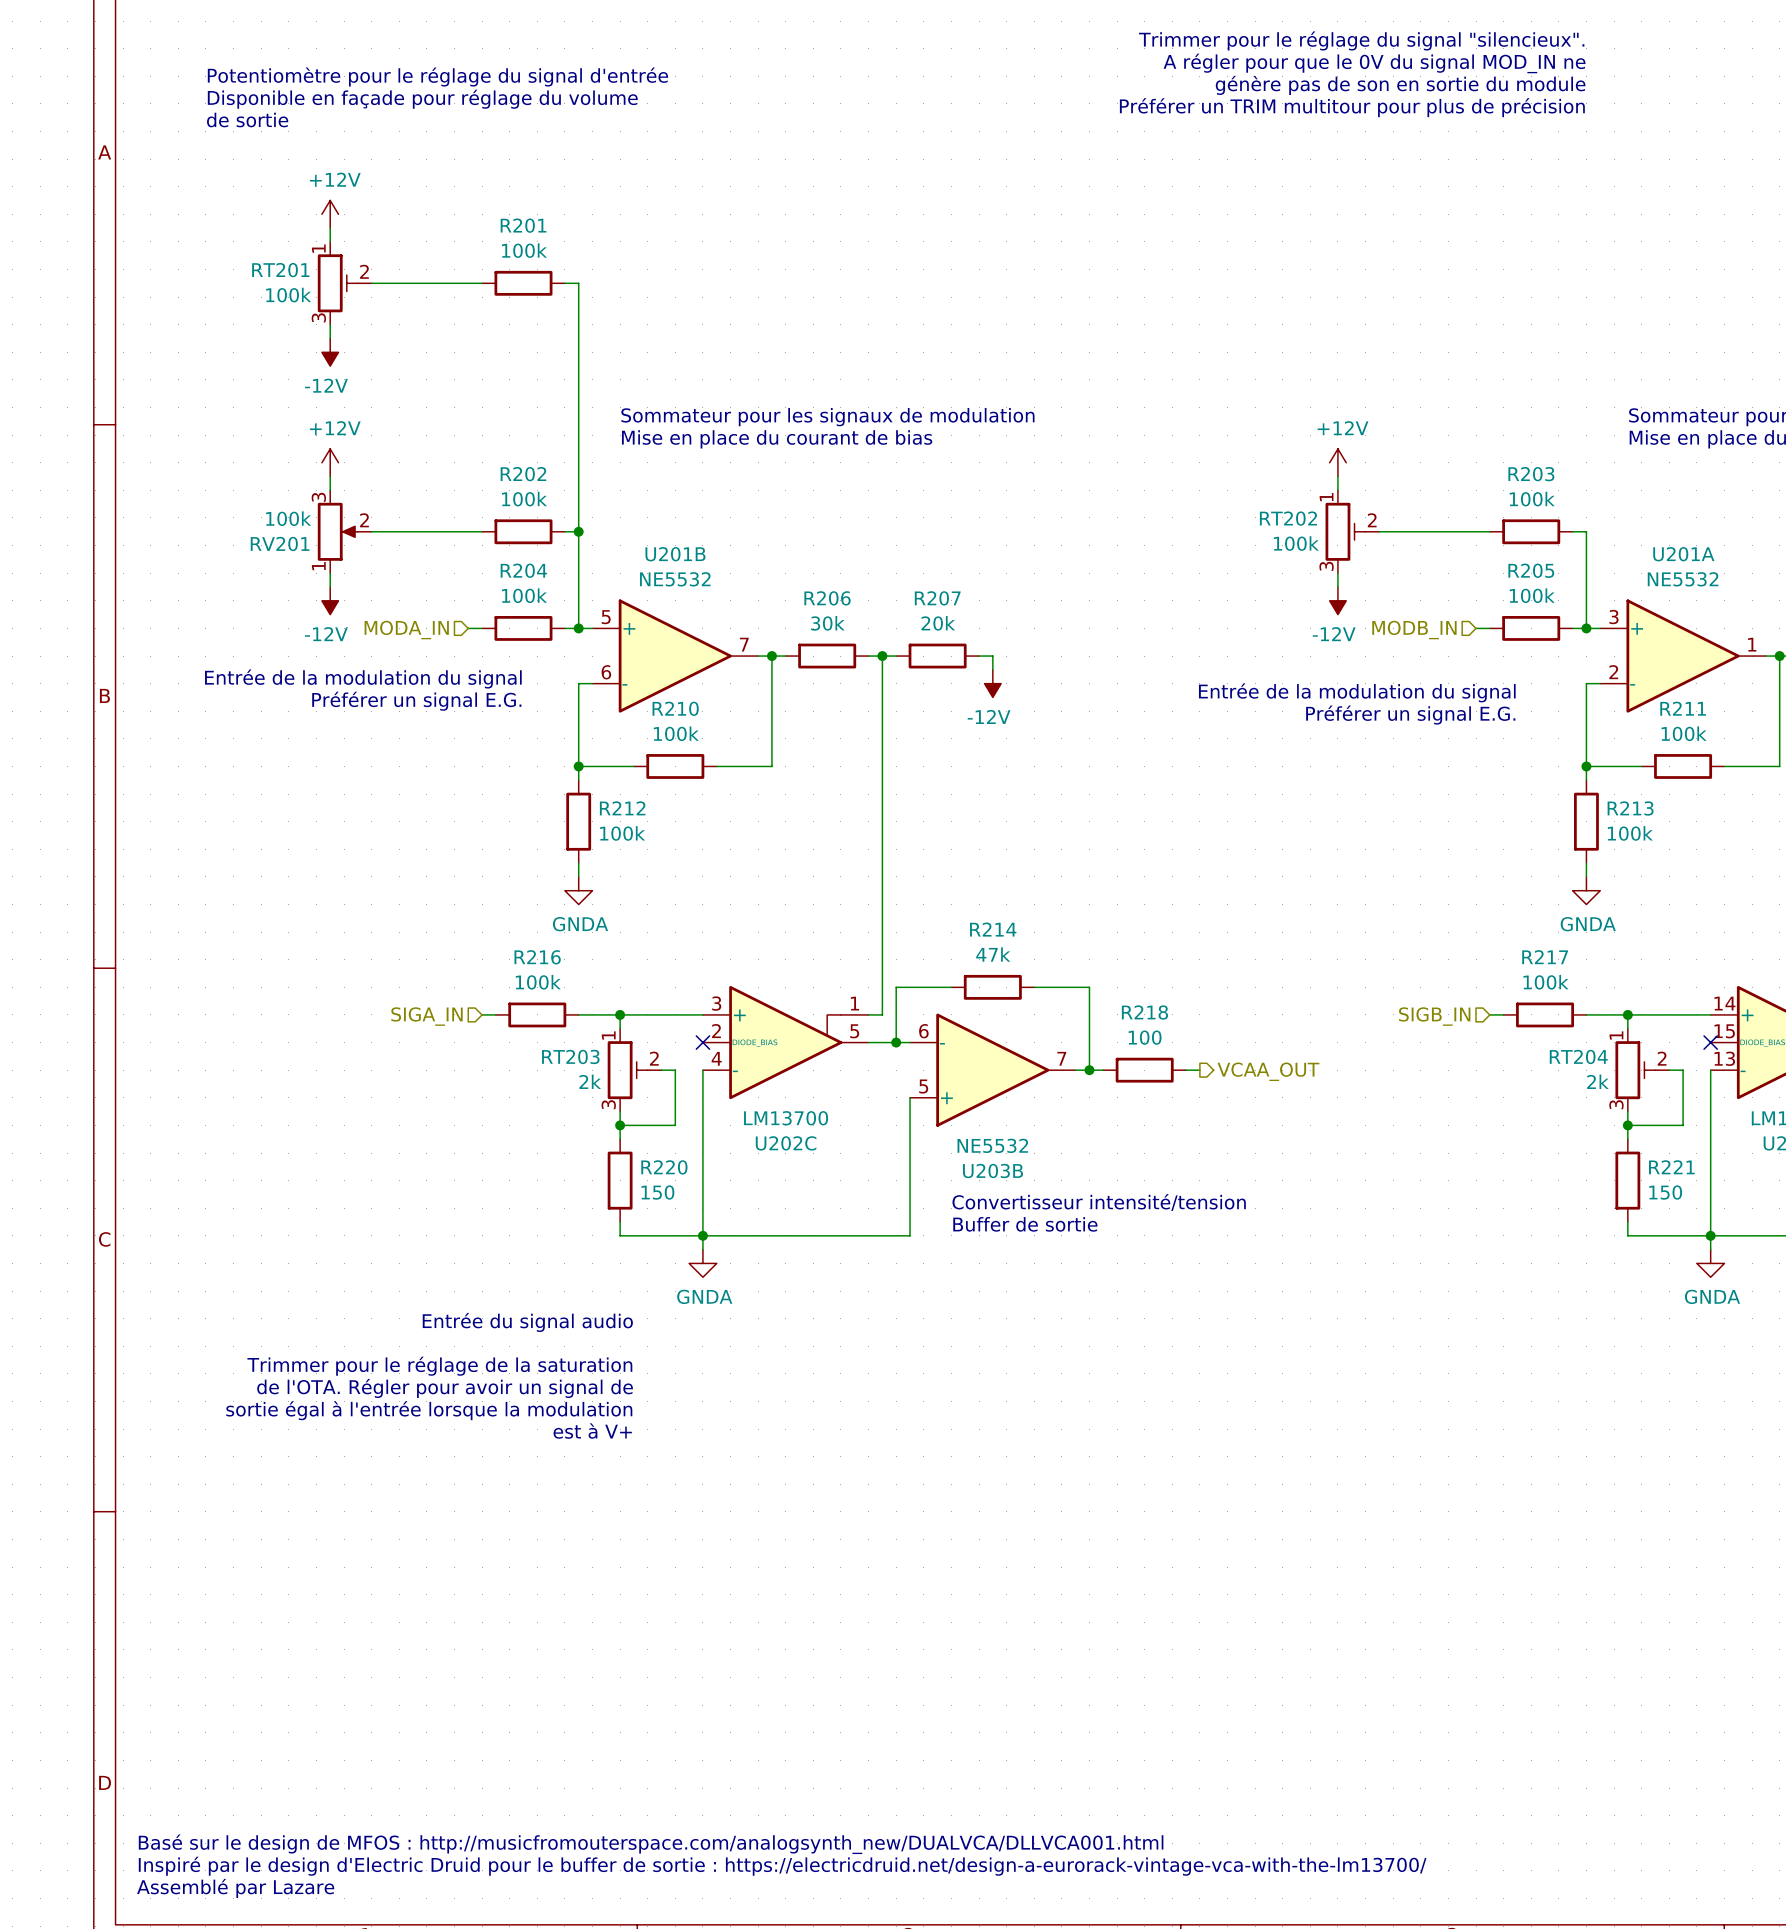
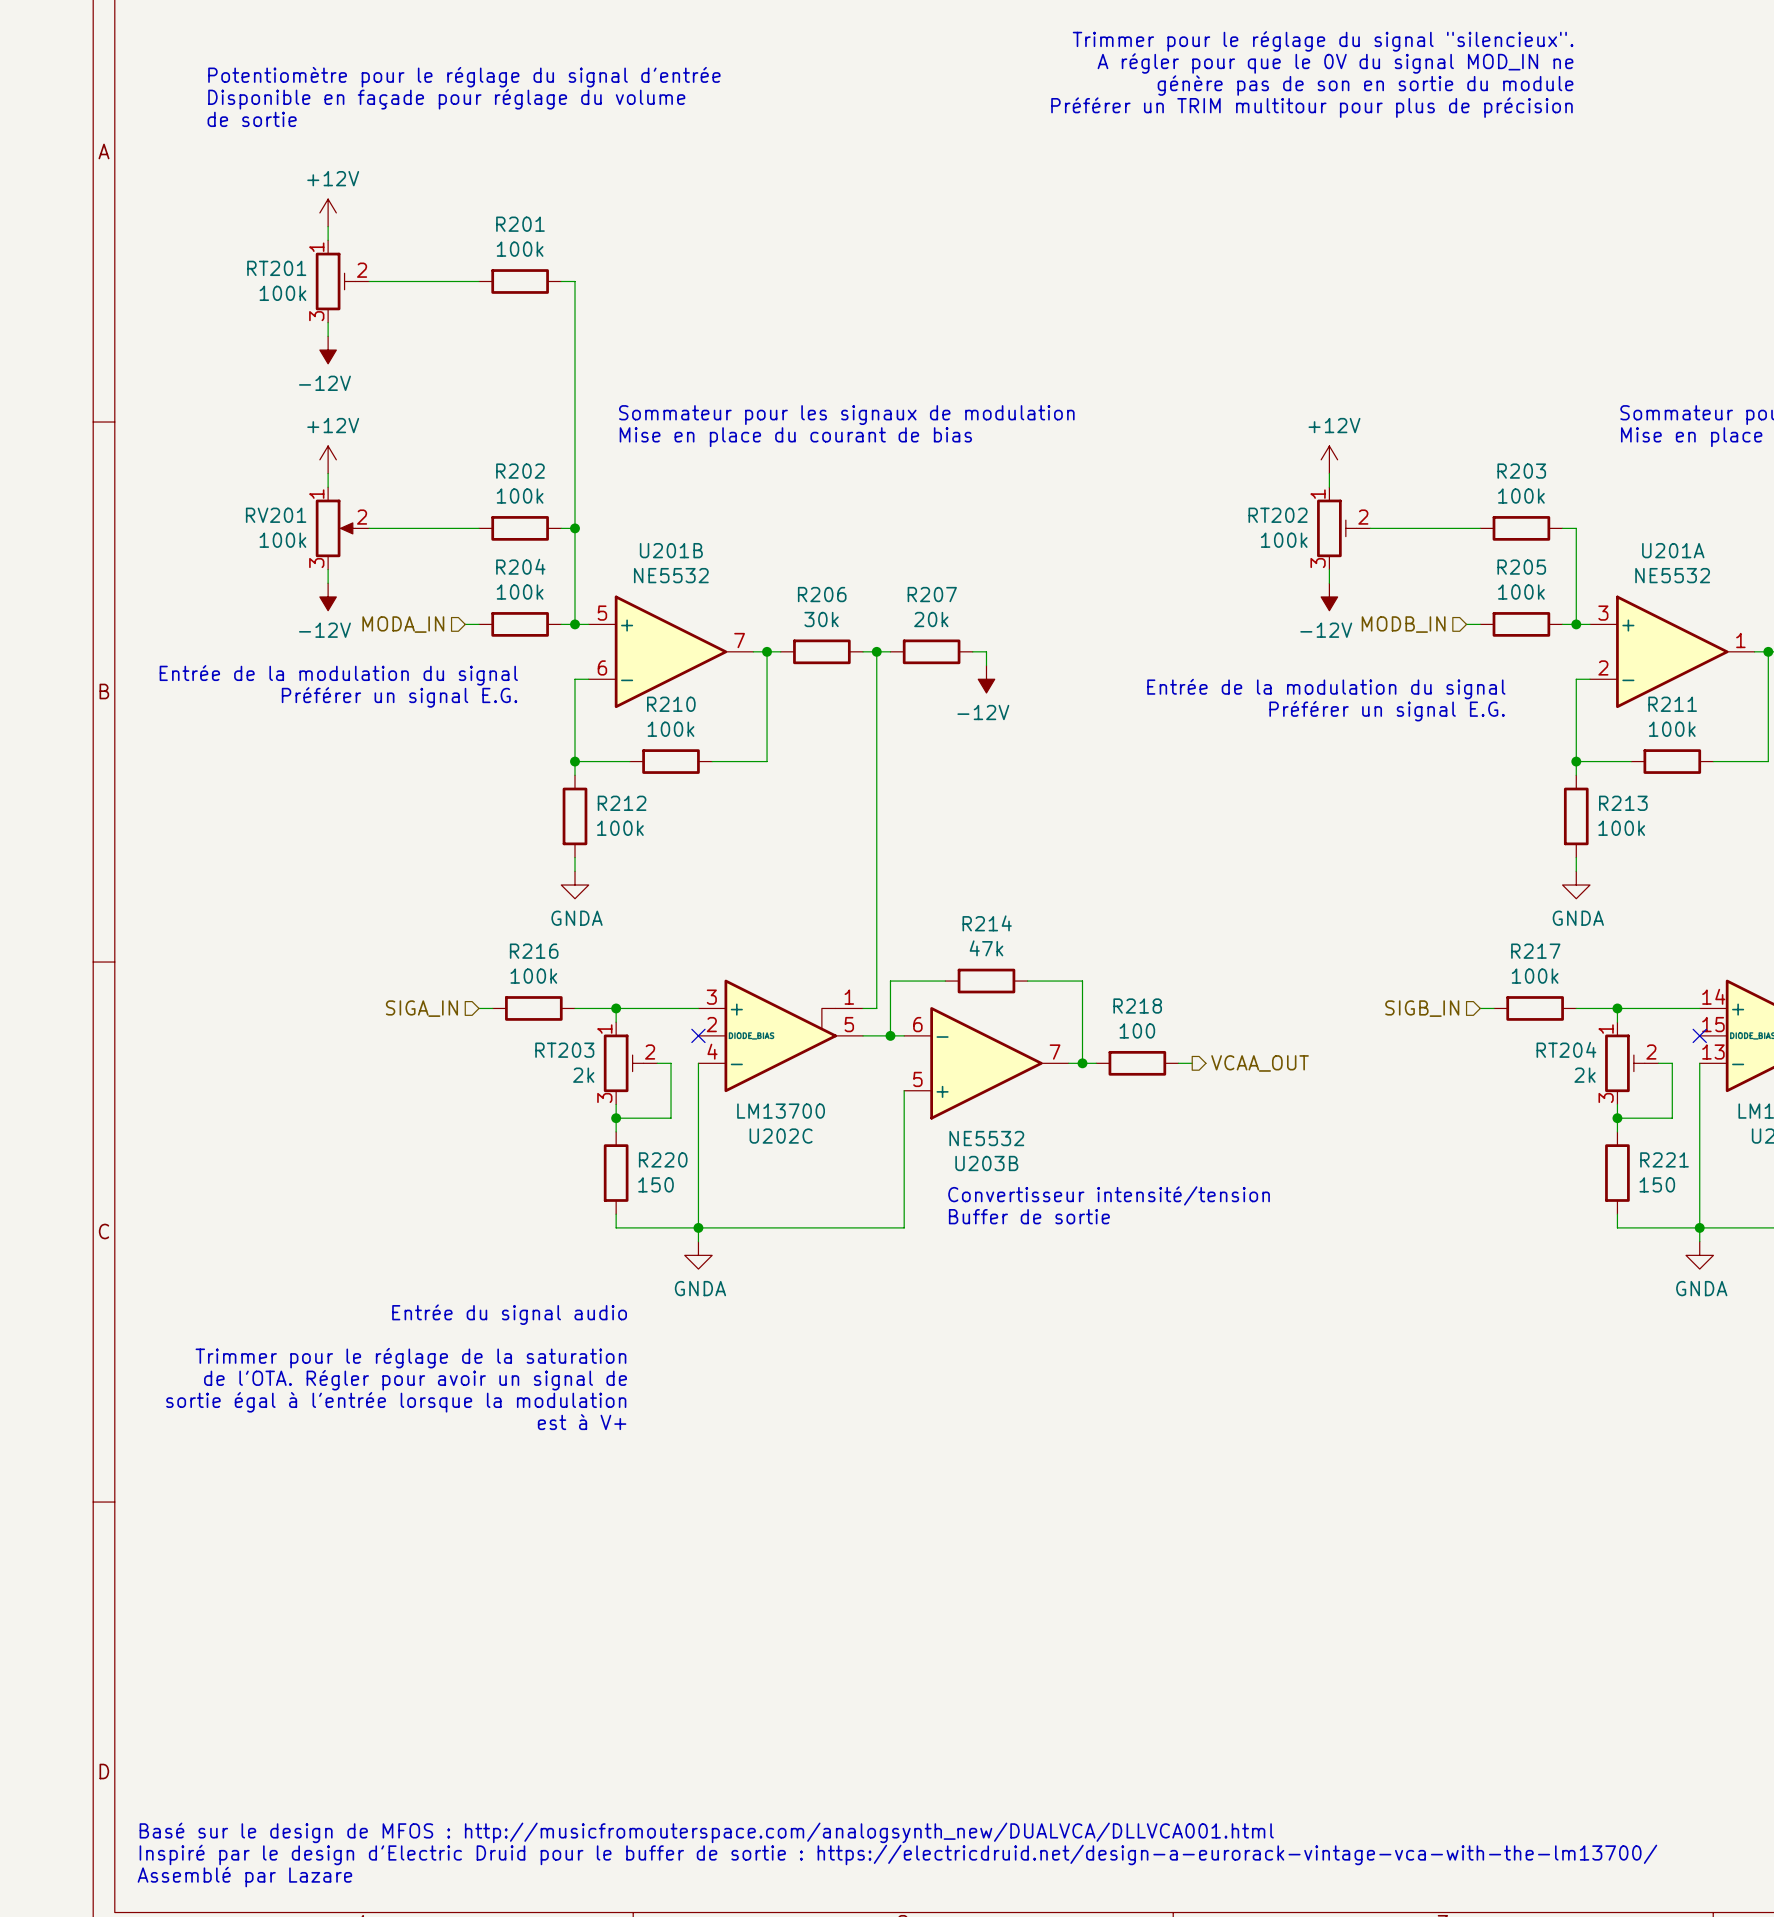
RV201 flip: as is (337, 531) -> up-down (335, 528)

